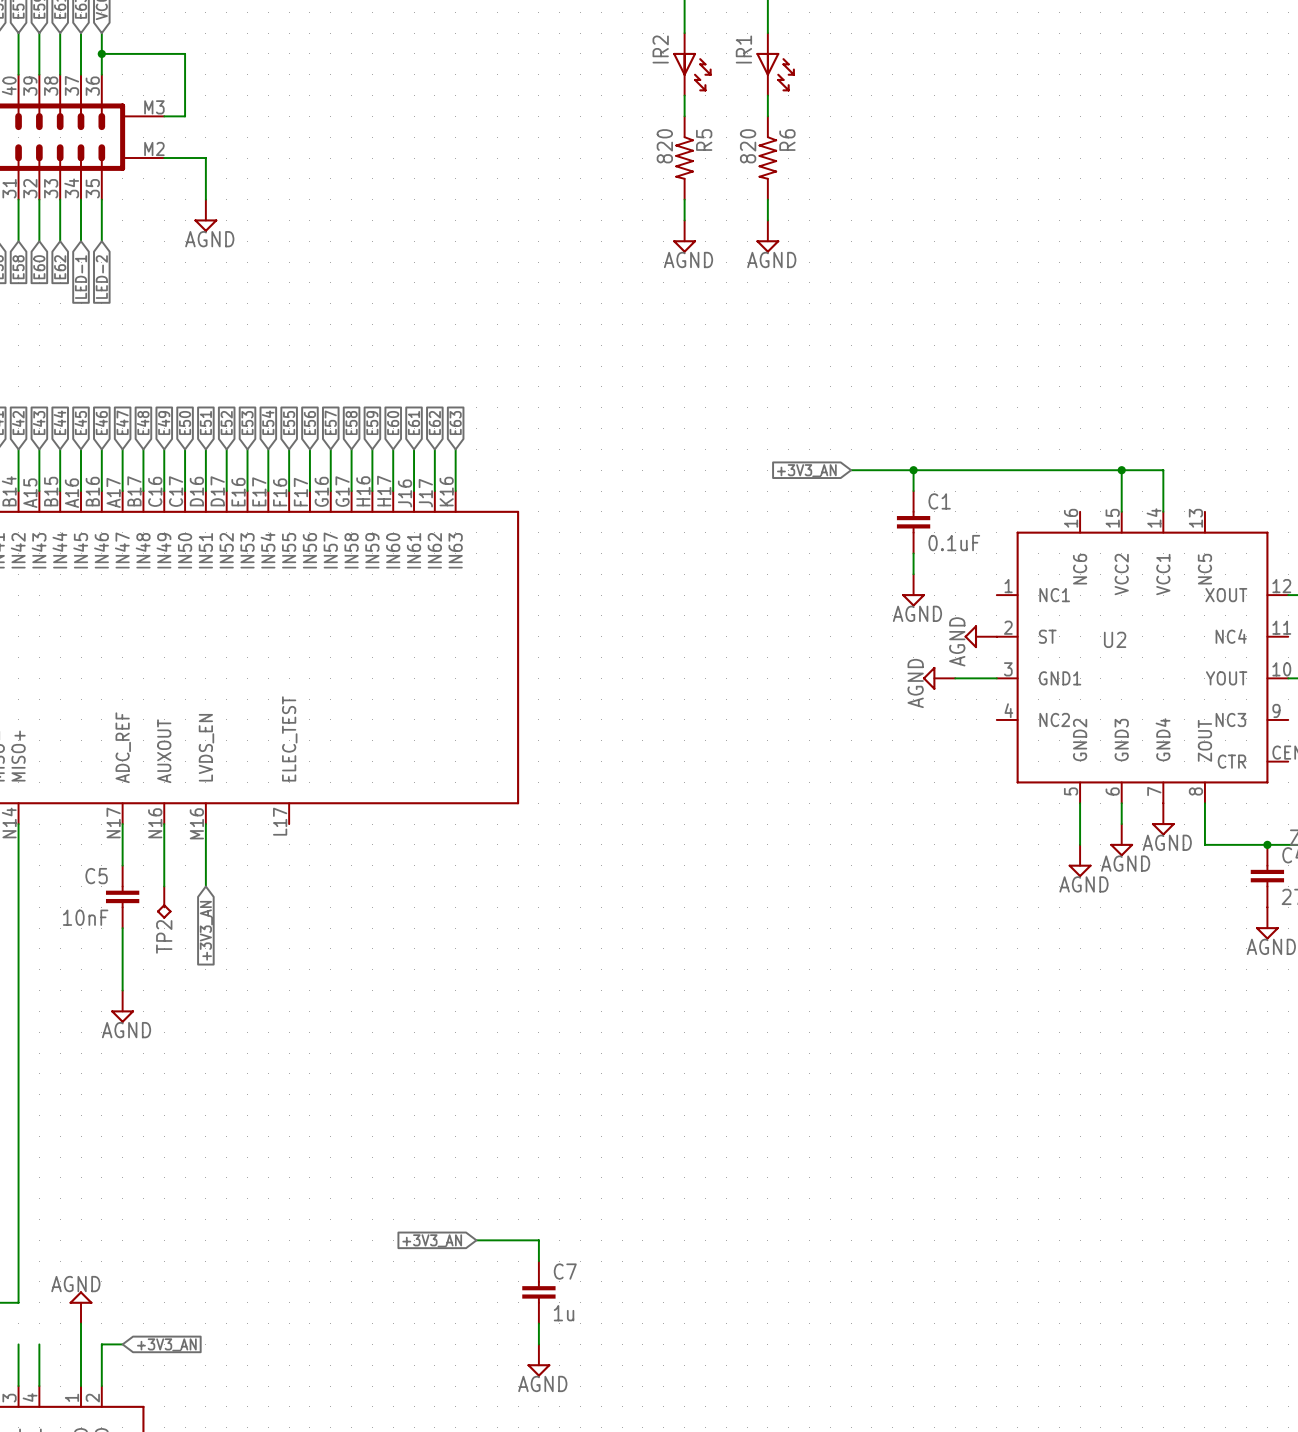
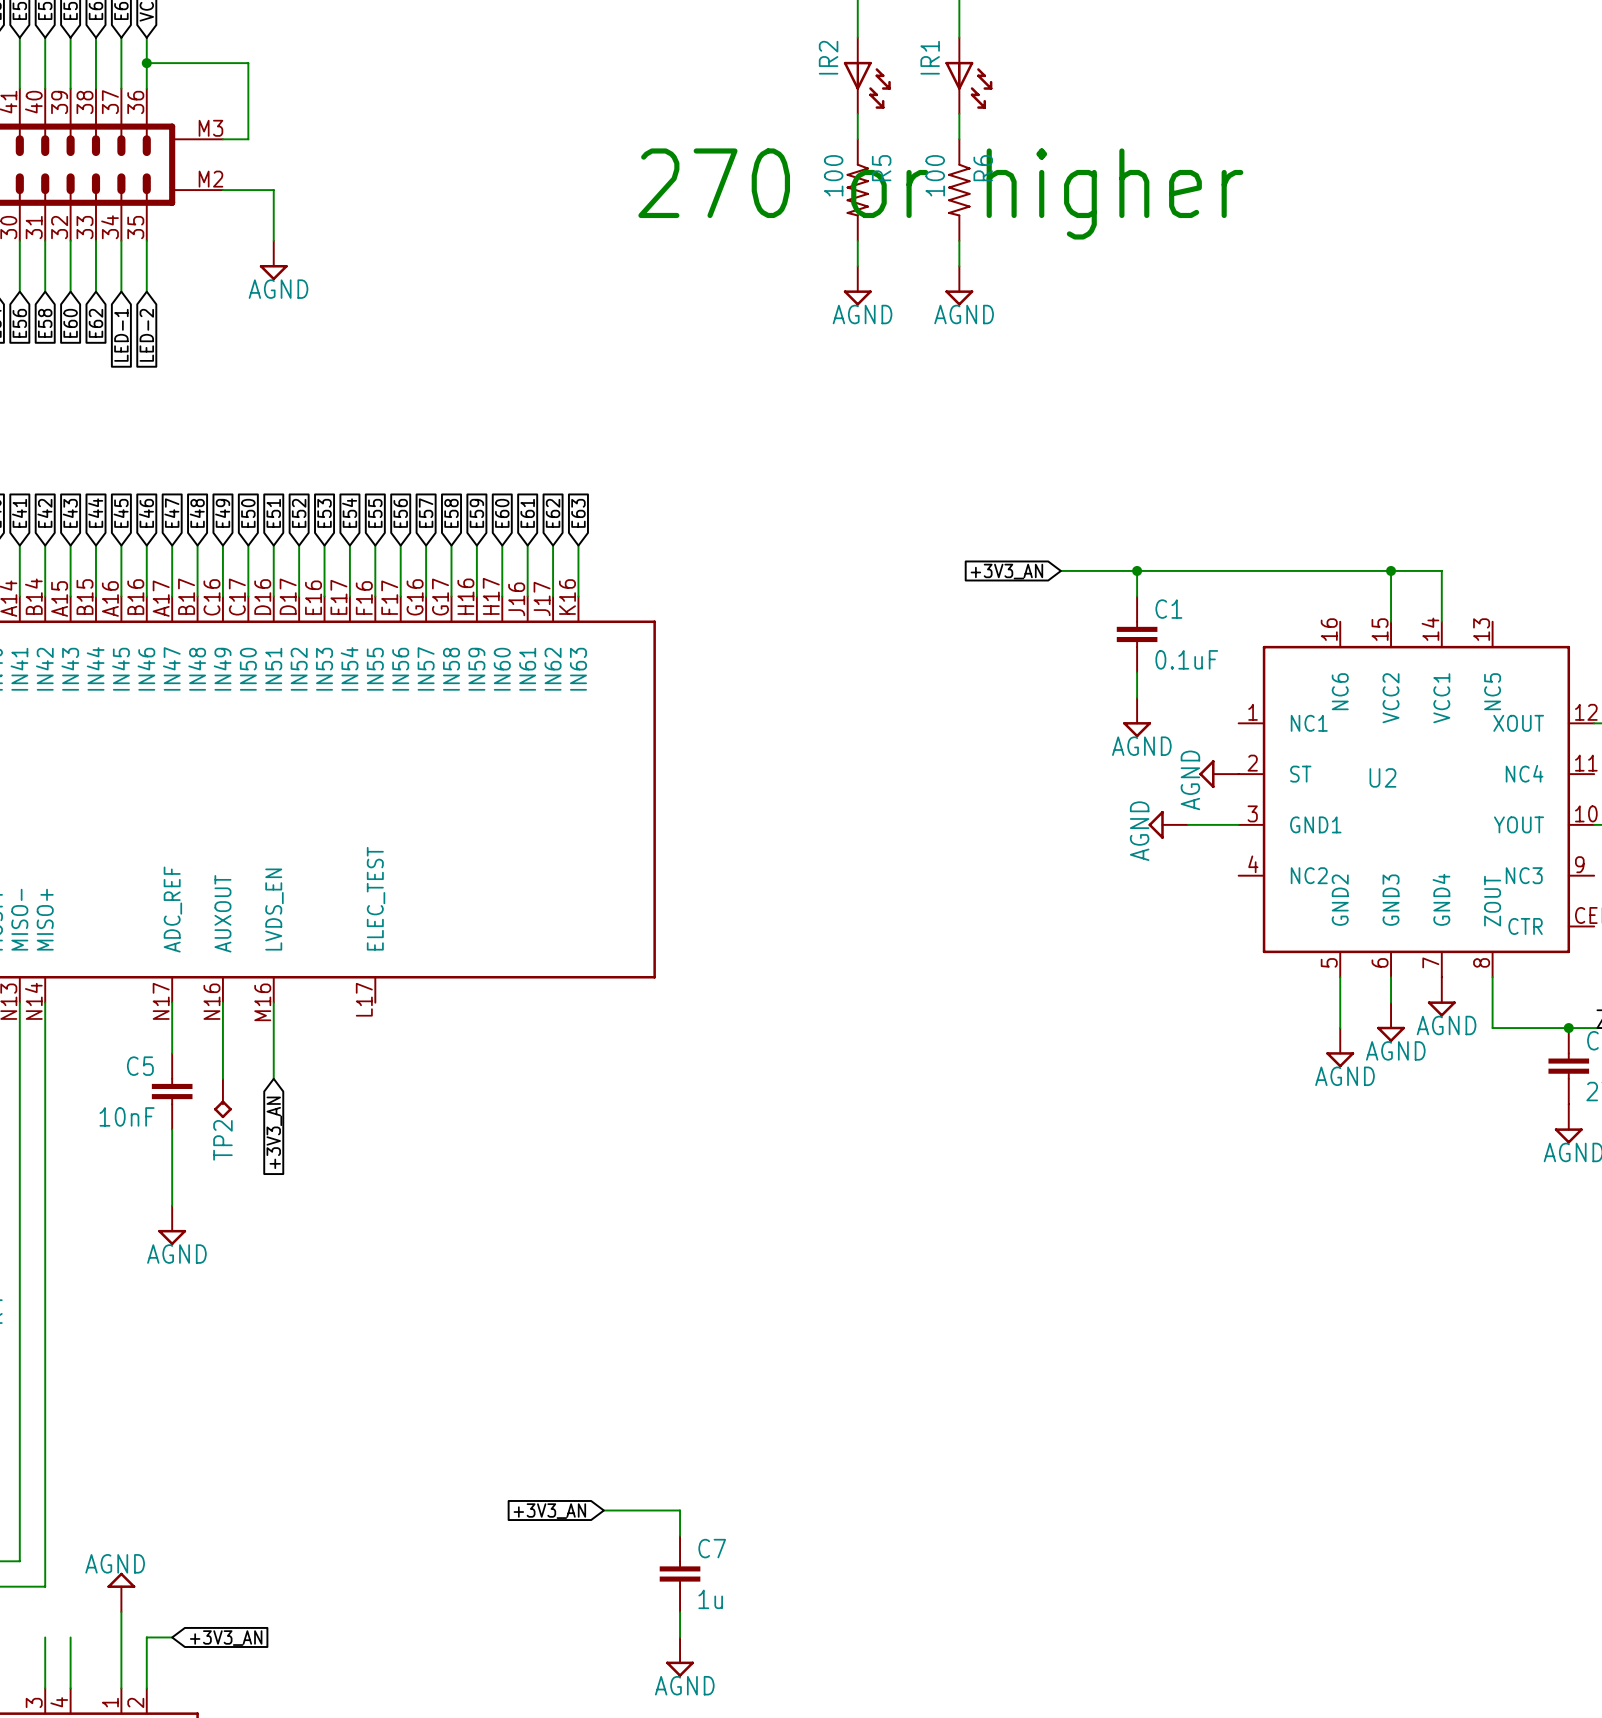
R5 value: 820 (664, 146) -> 100 (833, 175)
R6 value: 820 (748, 146) -> 100 (935, 175)
text: none -> 270 or higher (940, 193)

